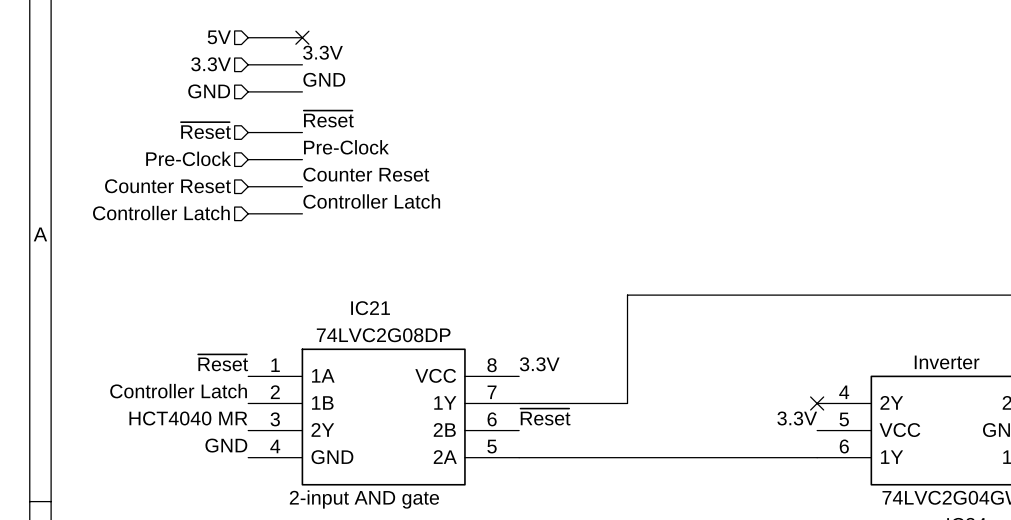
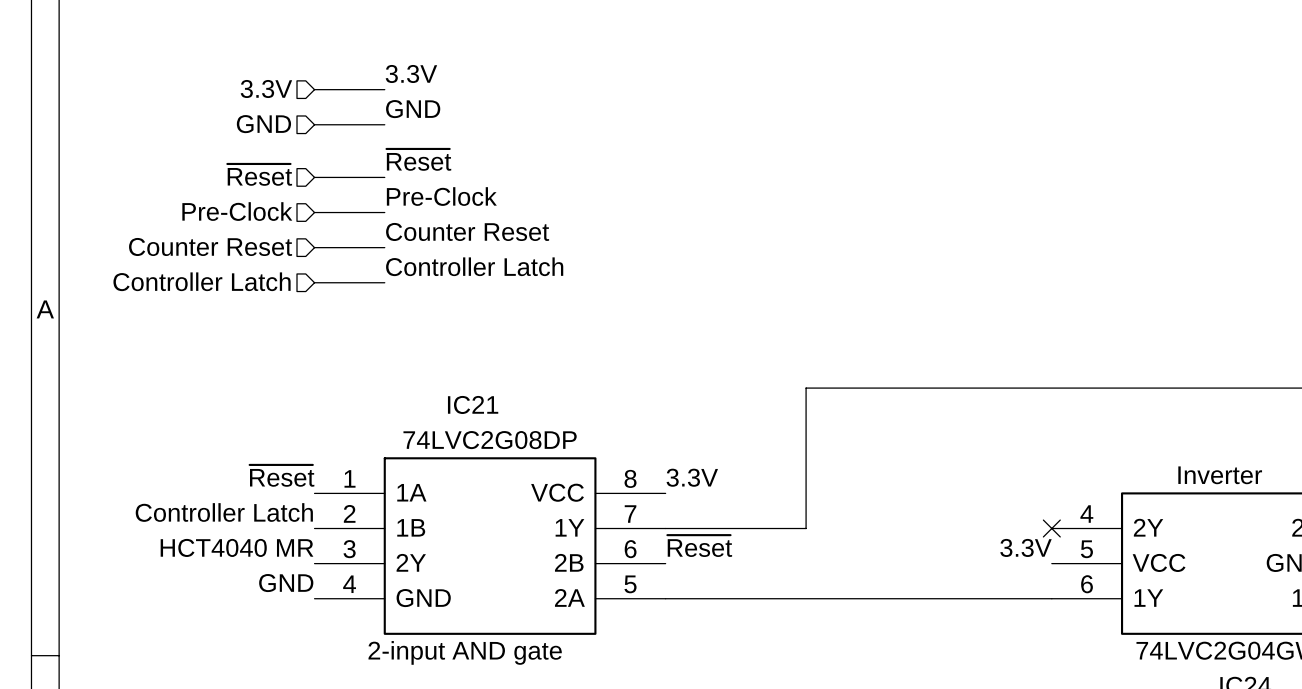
hierarchical label: 5V (219, 37) -> none
wire: (248, 37) (302, 37) -> none
no-connect mark: (302, 37) -> none

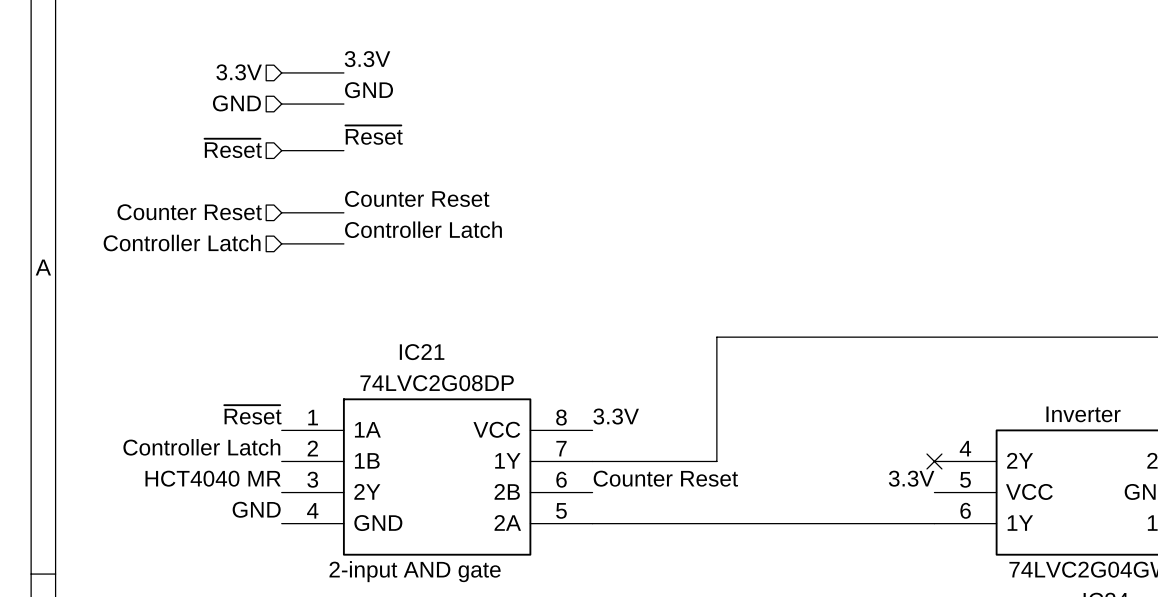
label: Pre-Clock (441, 196) -> none
hierarchical label: Pre-Clock (237, 211) -> none
wire: (314, 212) (384, 212) -> none
label: ~{Reset} (699, 546) -> Counter Reset (665, 478)

